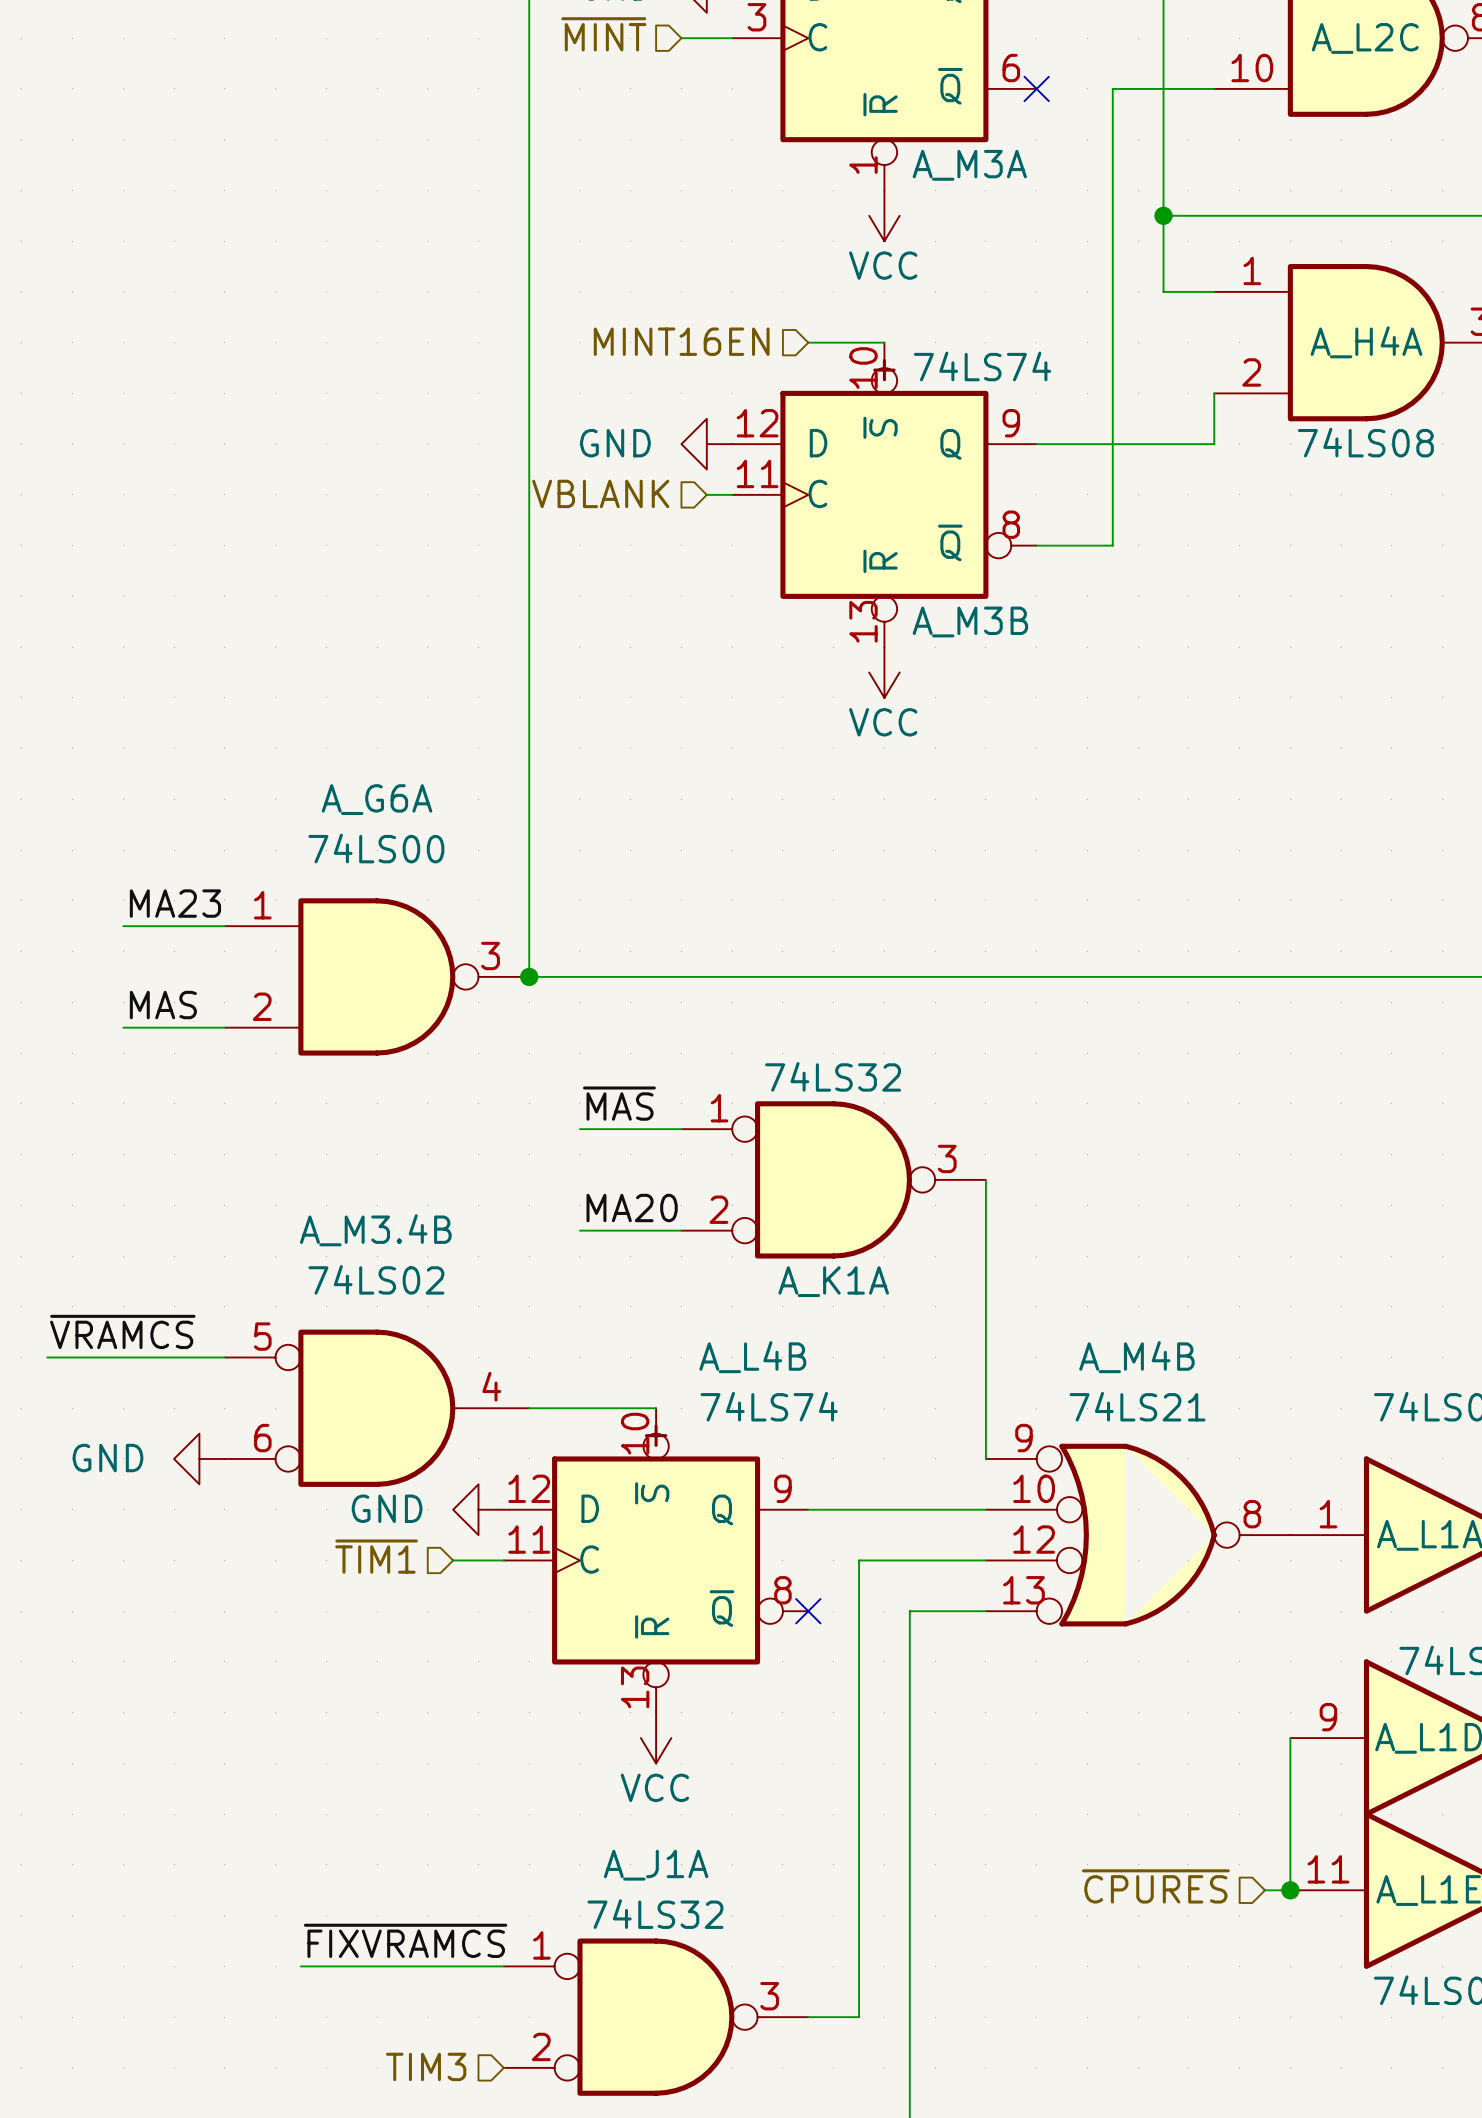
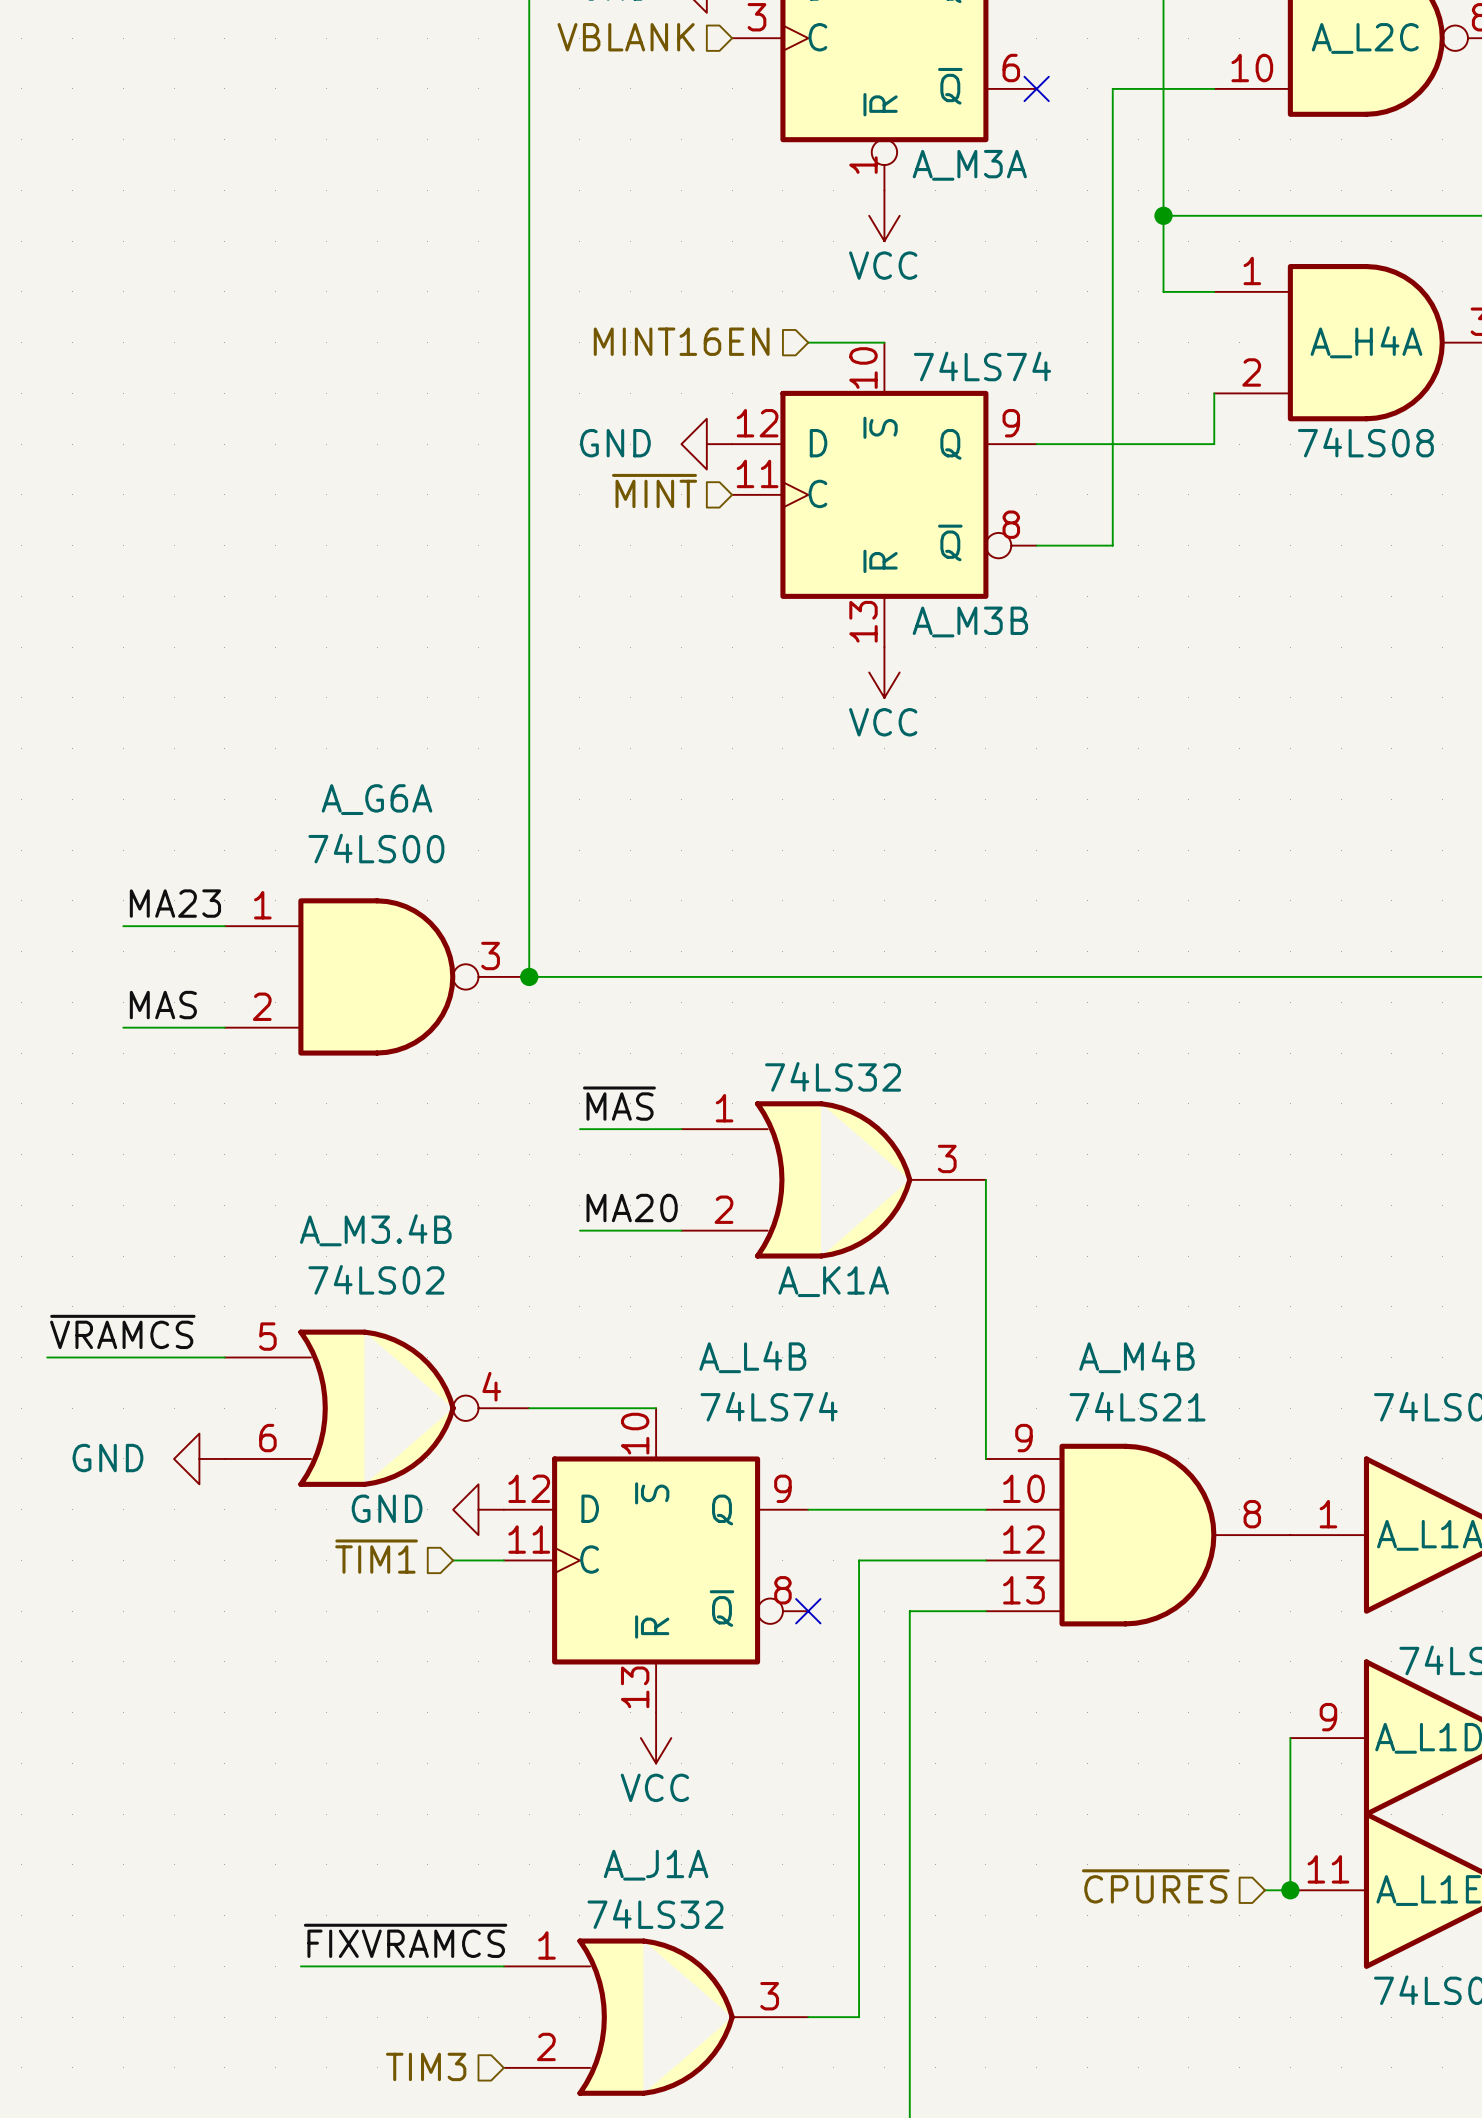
hierarchical label position: ~{MINT} (603, 34) -> ~{MINT} (654, 491)
wire: (681, 38) (732, 38) -> none
A_M3B symbol: [732, 342, 1037, 648] -> [732, 342, 1037, 648]
hierarchical label position: VBLANK (600, 493) -> VBLANK (626, 37)
wire: (706, 494) (732, 494) -> none
A_K1A symbol: [681, 1101, 986, 1259] -> [681, 1101, 986, 1259]
A_M3.4B symbol: [224, 1329, 530, 1487] -> [224, 1329, 530, 1487]
A_L4B symbol: [503, 1408, 809, 1713] -> [503, 1408, 809, 1713]
A_M4B symbol: [985, 1443, 1291, 1627] -> [985, 1443, 1291, 1627]
A_J1A symbol: [503, 1938, 809, 2096] -> [503, 1938, 809, 2096]

